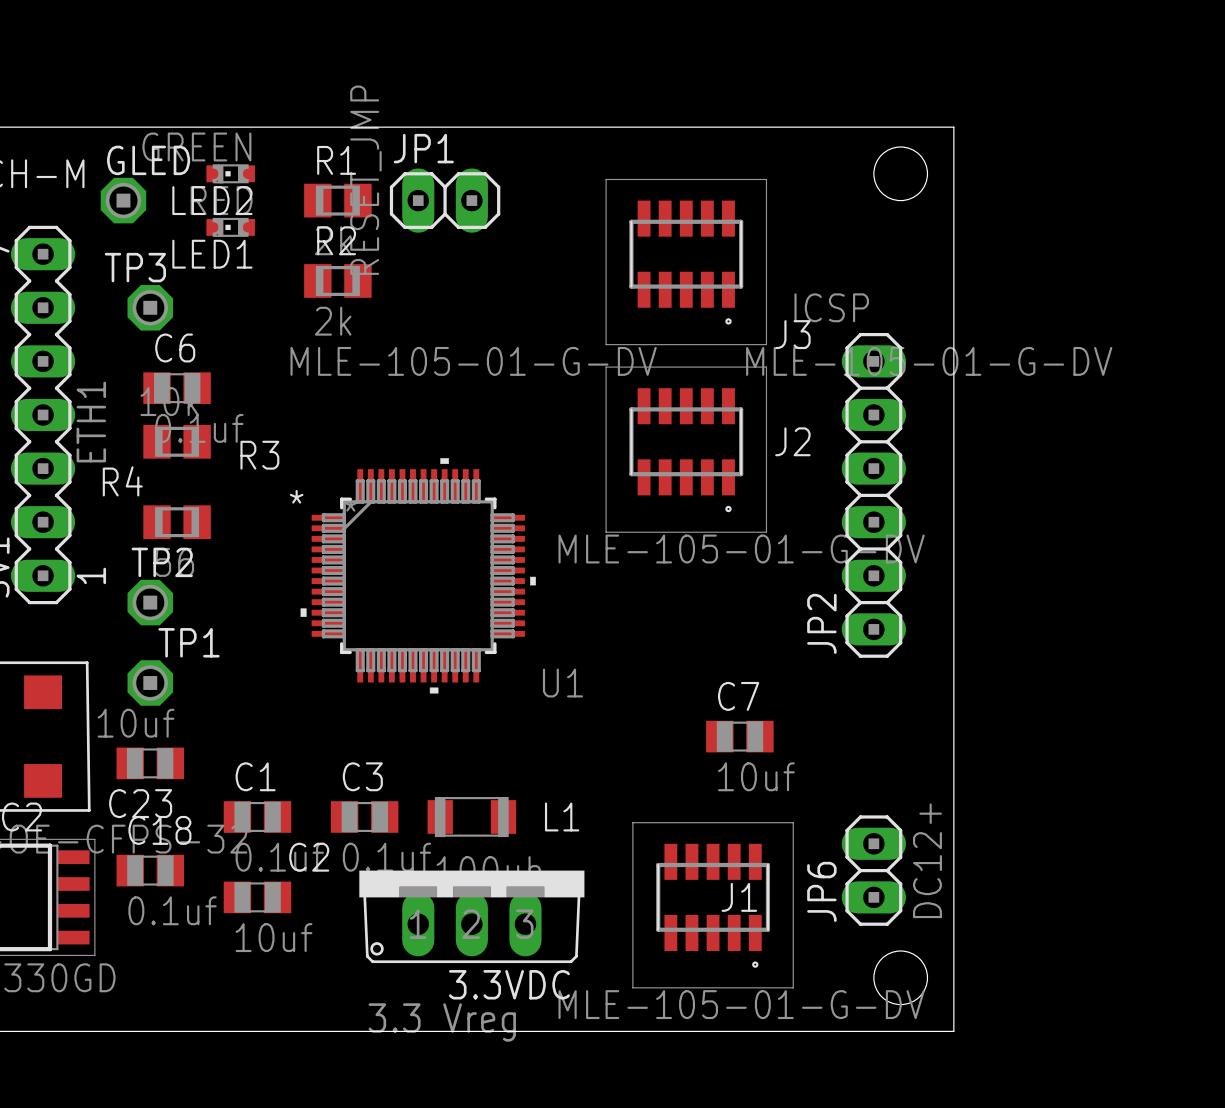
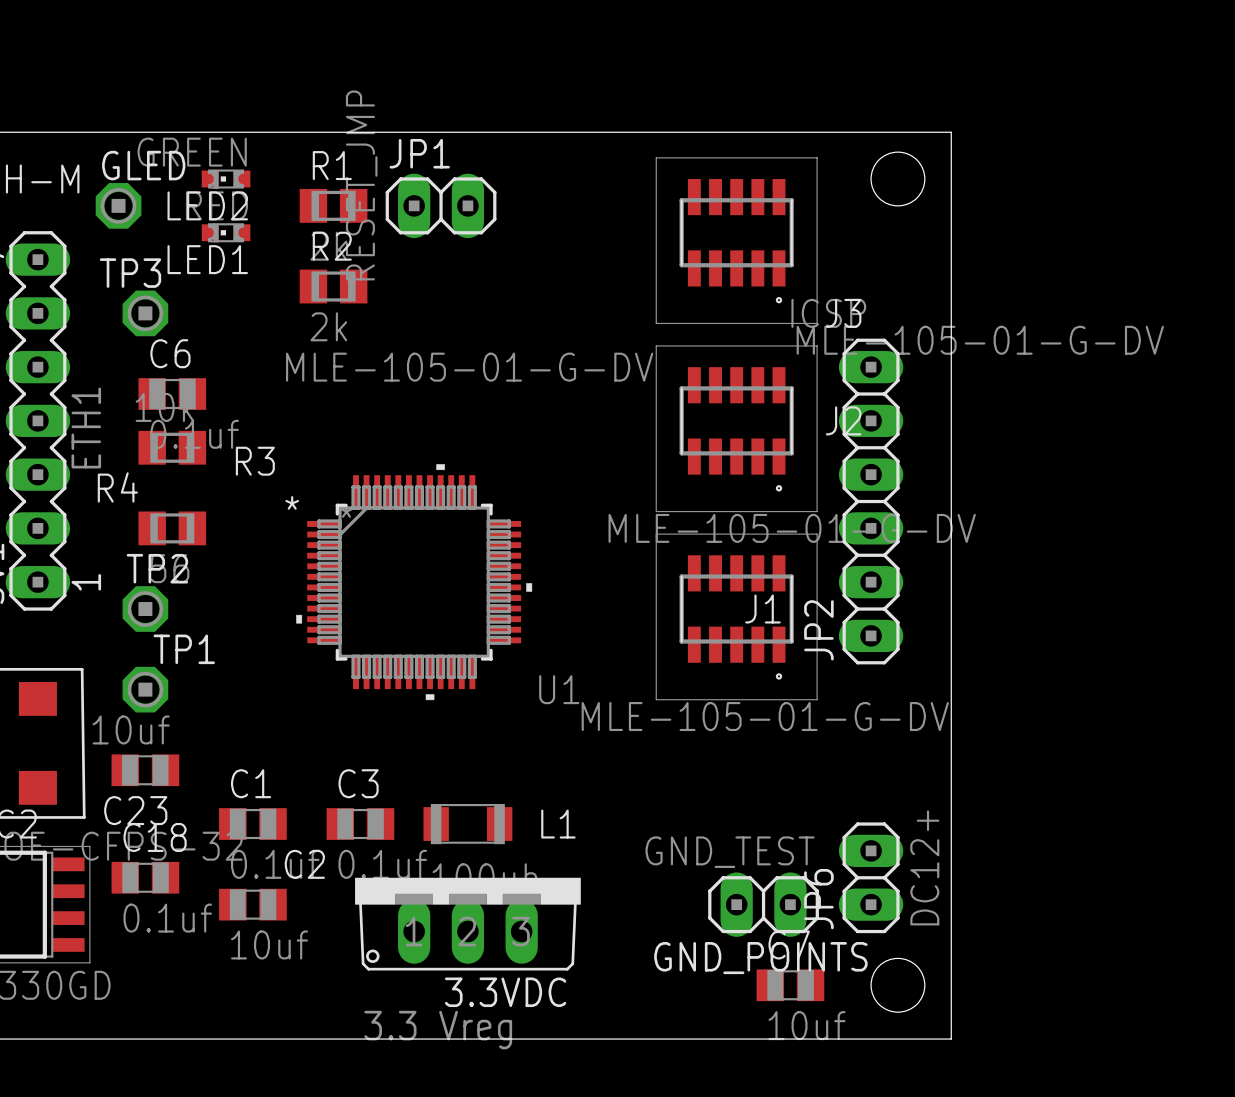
J3 position: (686, 262) -> (736, 240)
J2 position: (686, 449) -> (736, 428)
C7 position: (739, 736) -> (790, 985)
GND_POINTS: none -> GND_TEST (763, 904)
J1 position: (713, 905) -> (736, 616)

